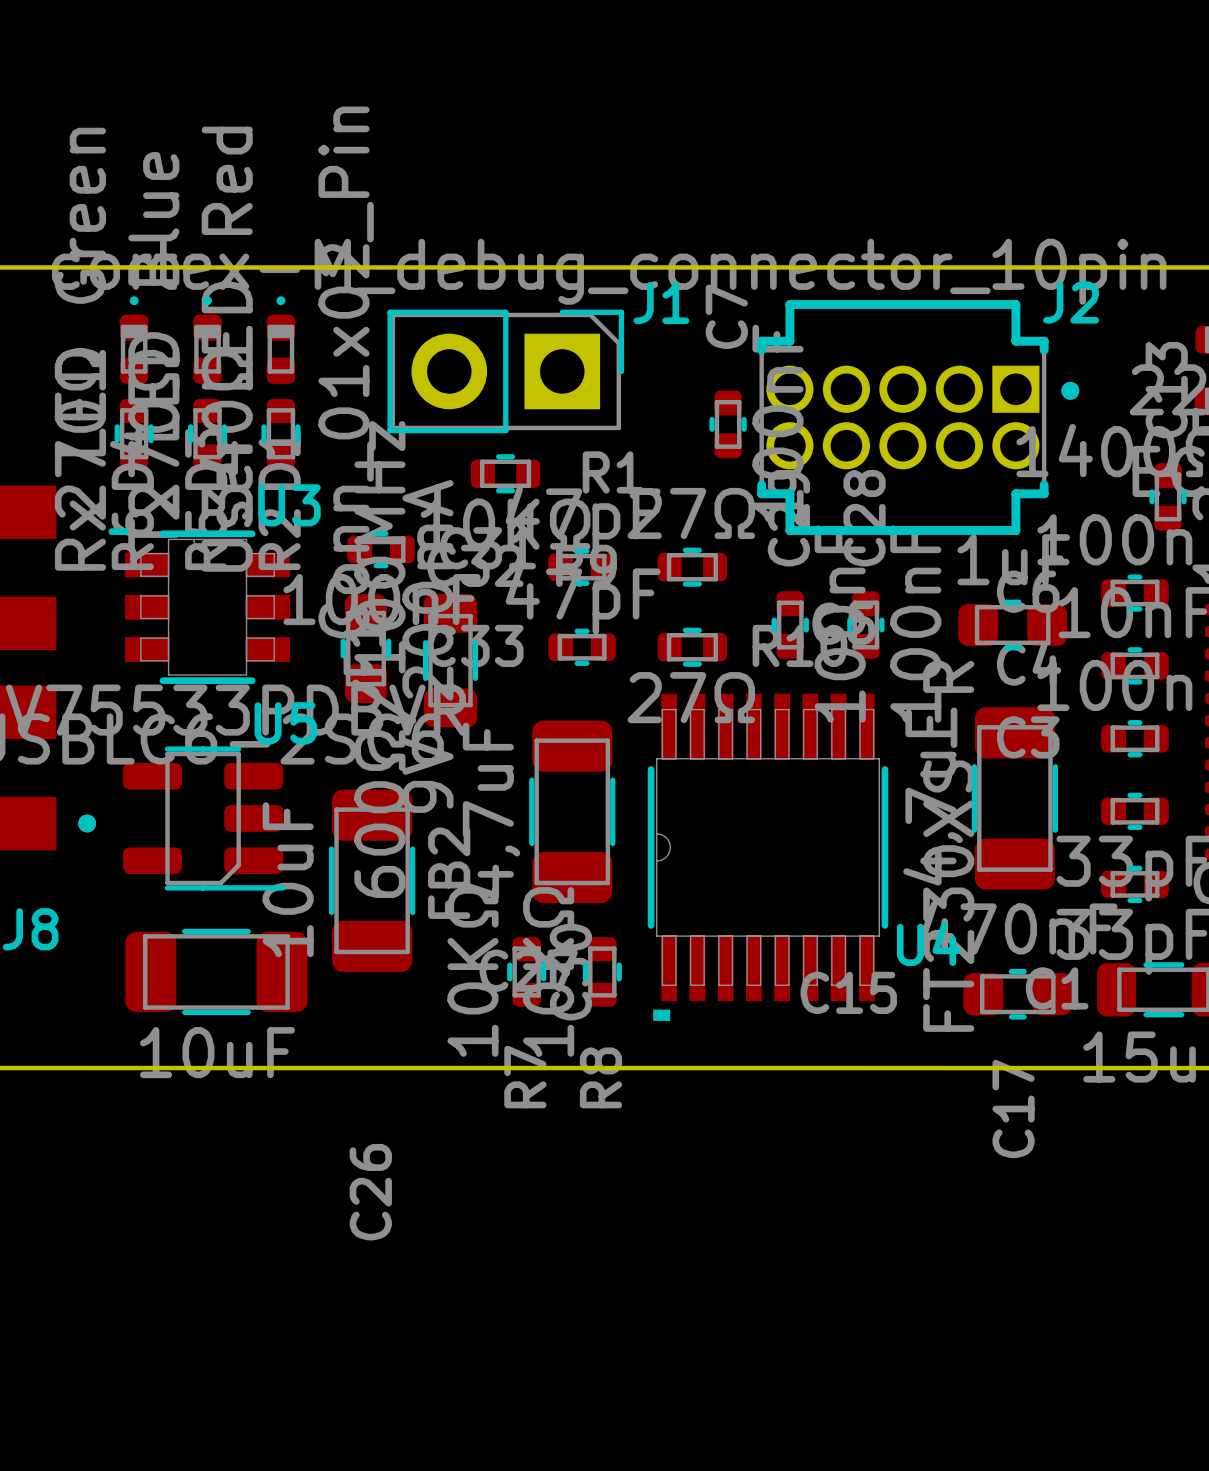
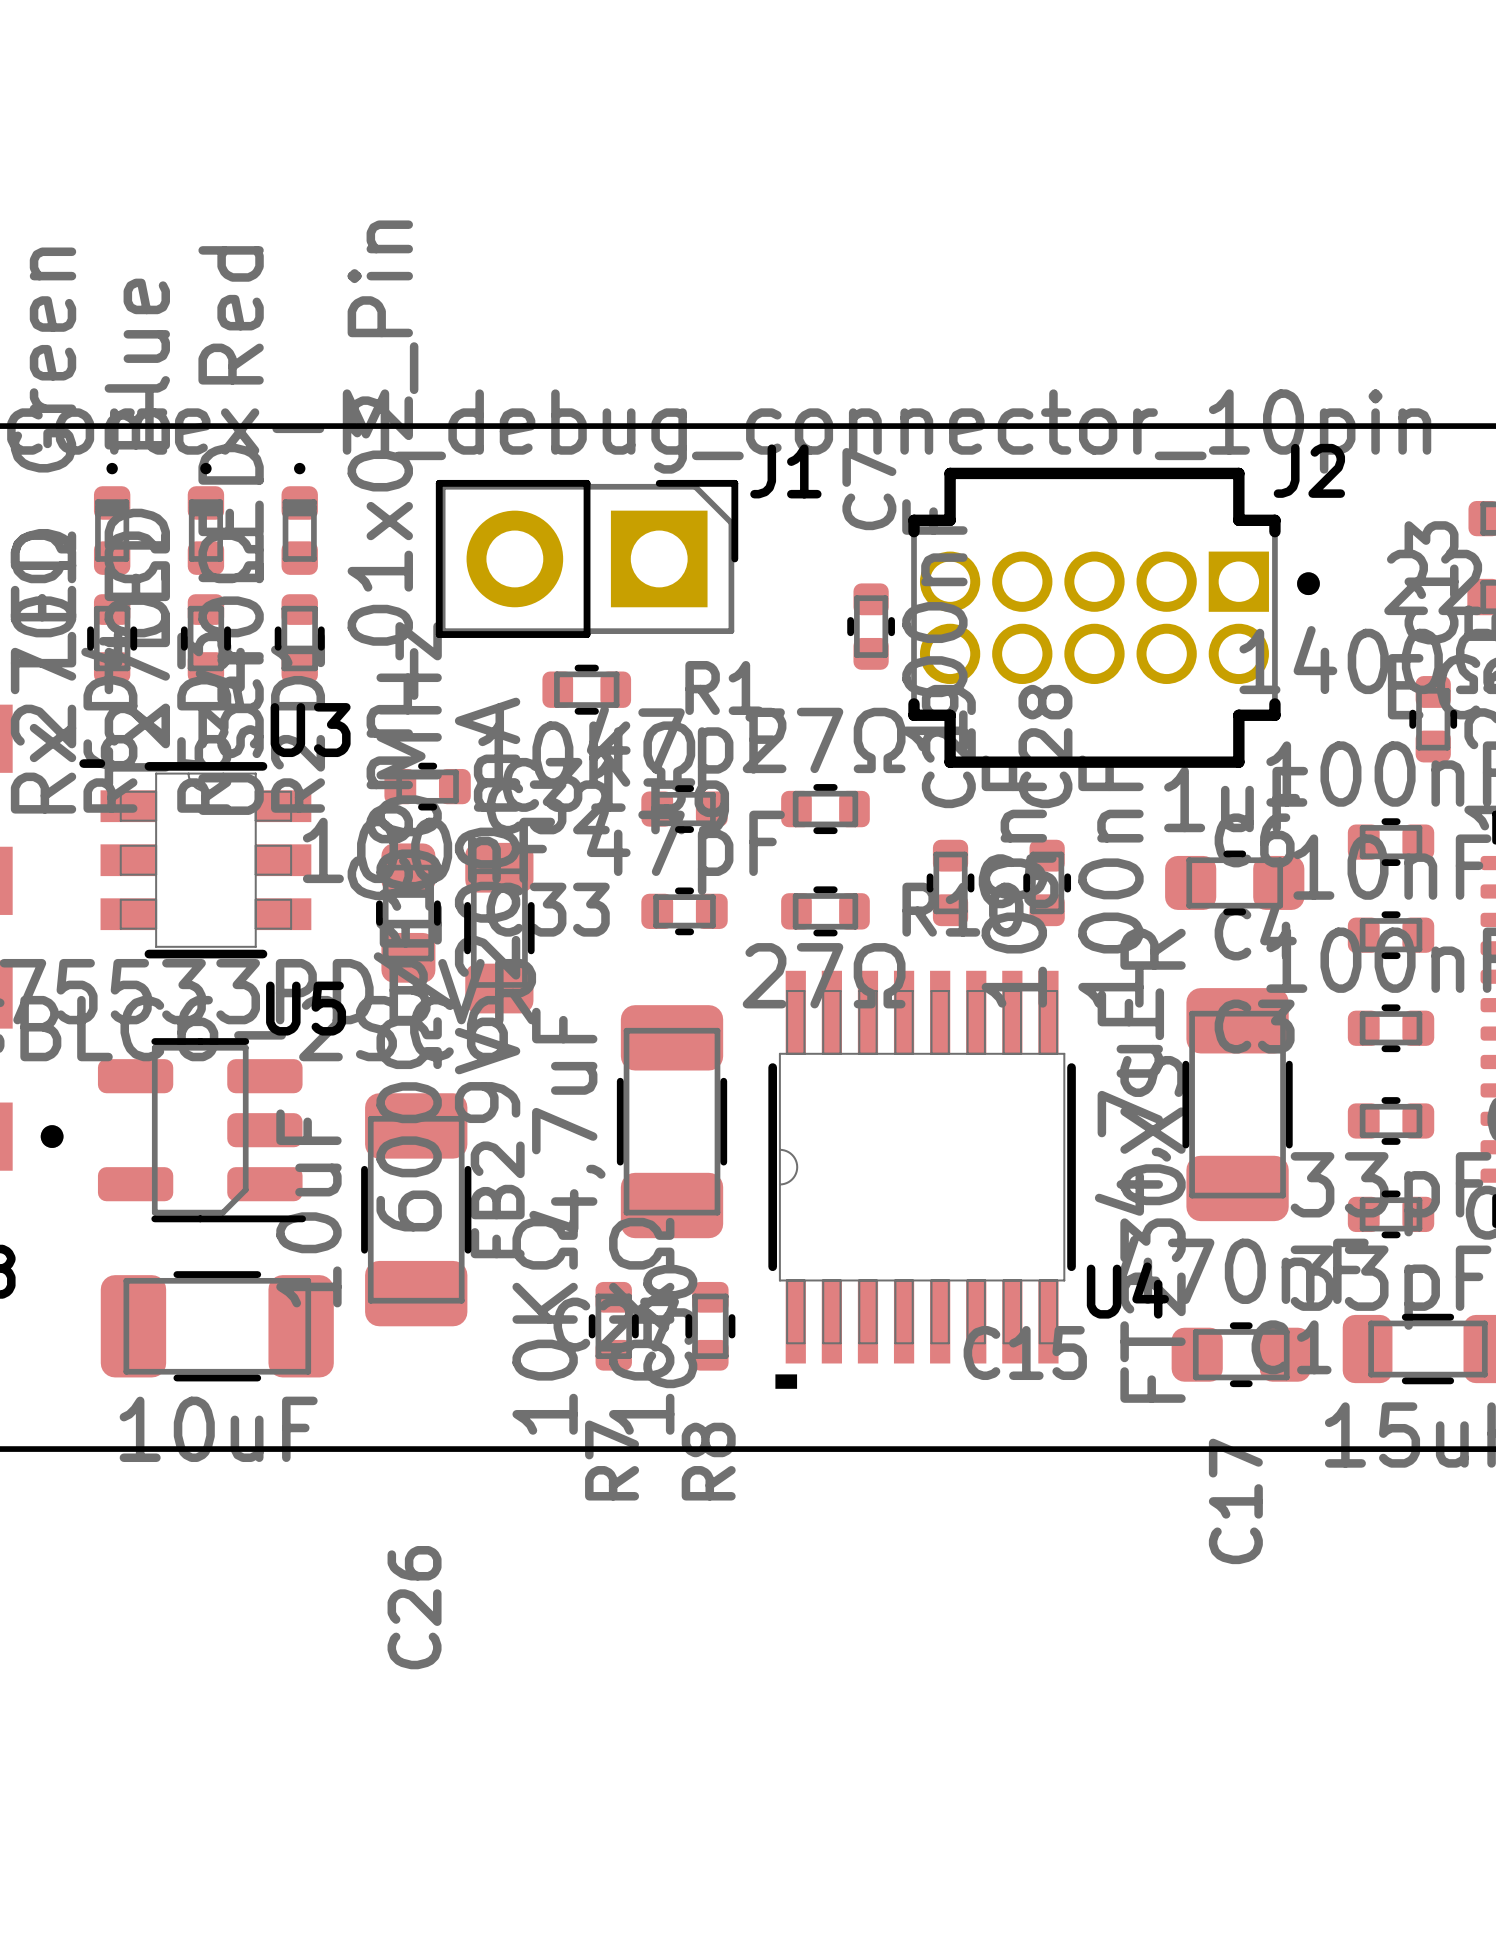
FB2 position: (450, 660) -> (499, 928)

